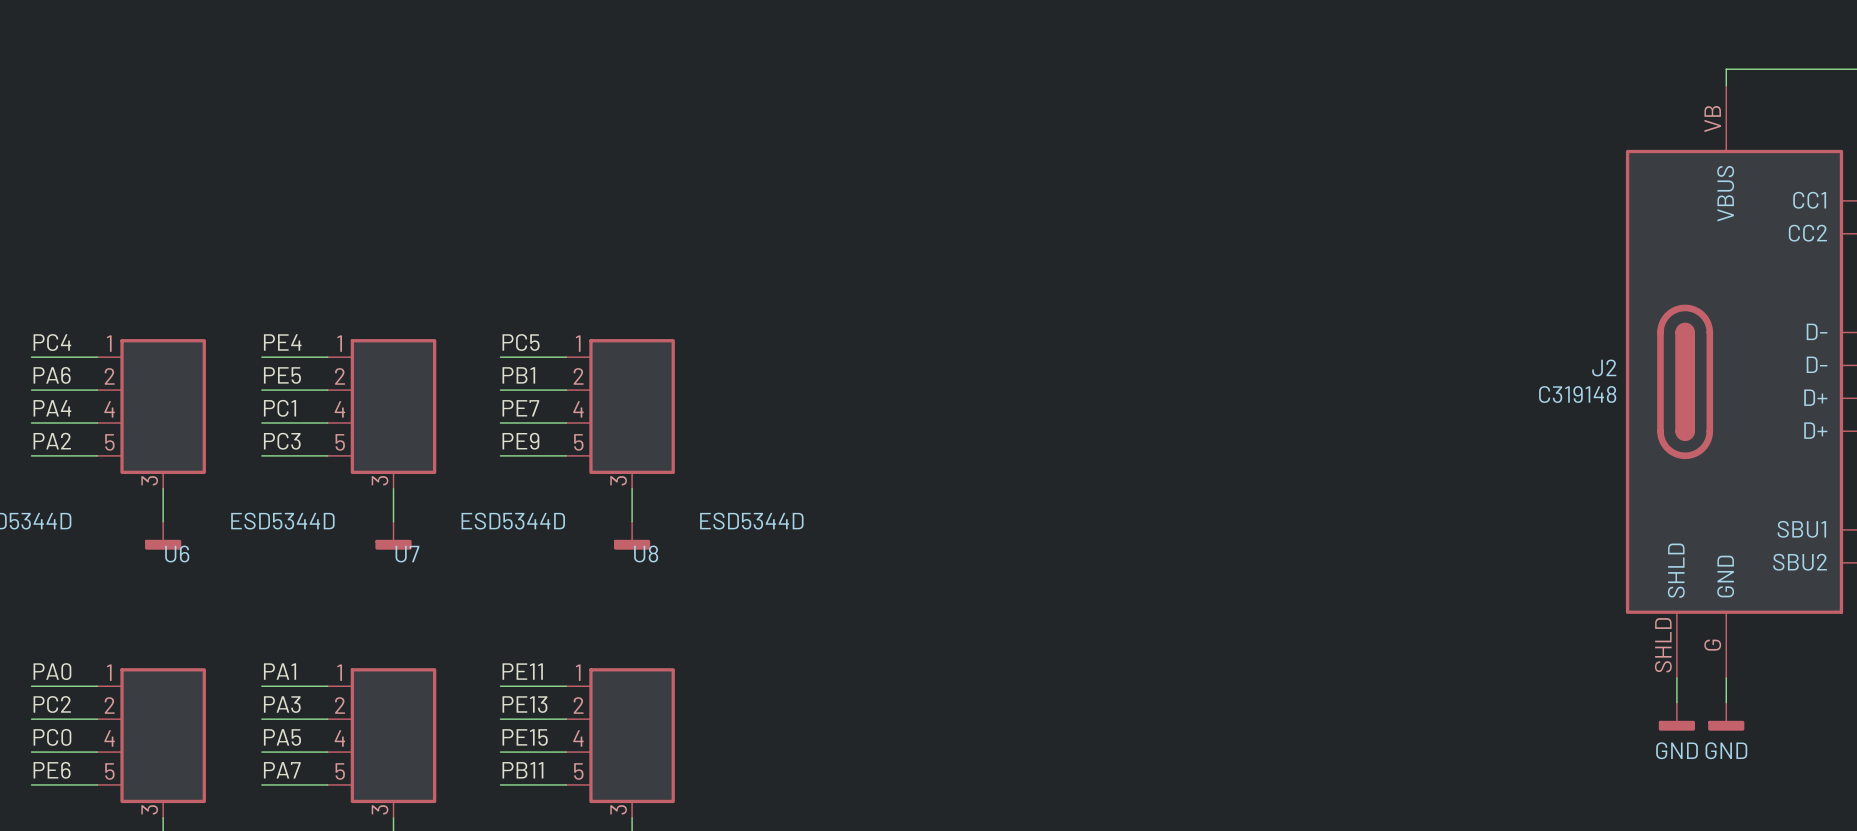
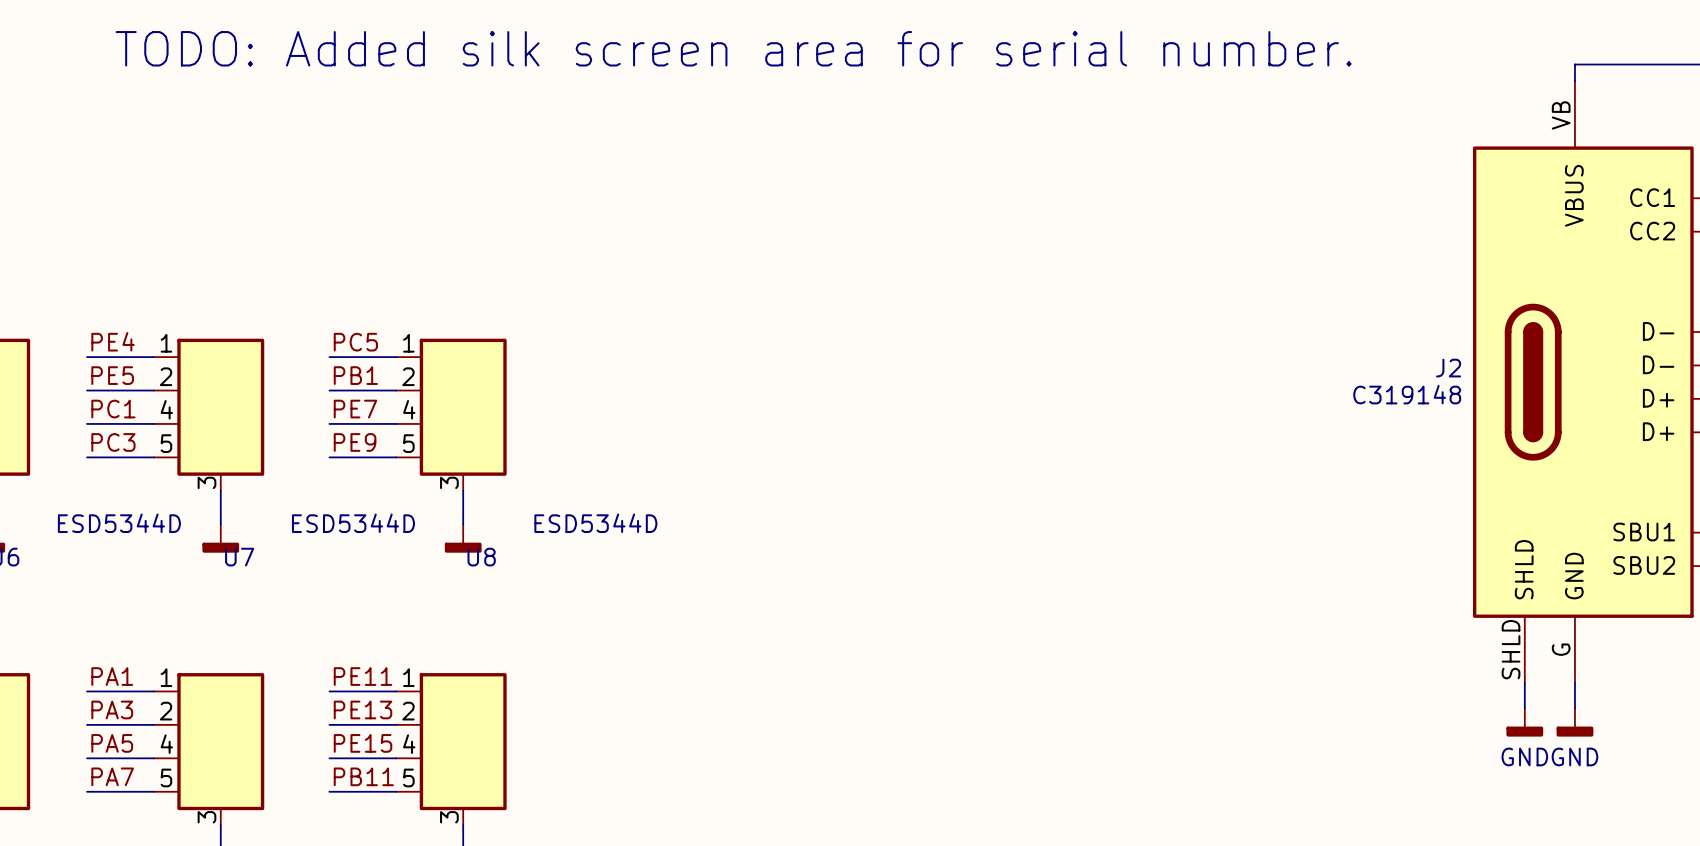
text: none -> TODO: Added silk screen area for serial number. (733, 48)

